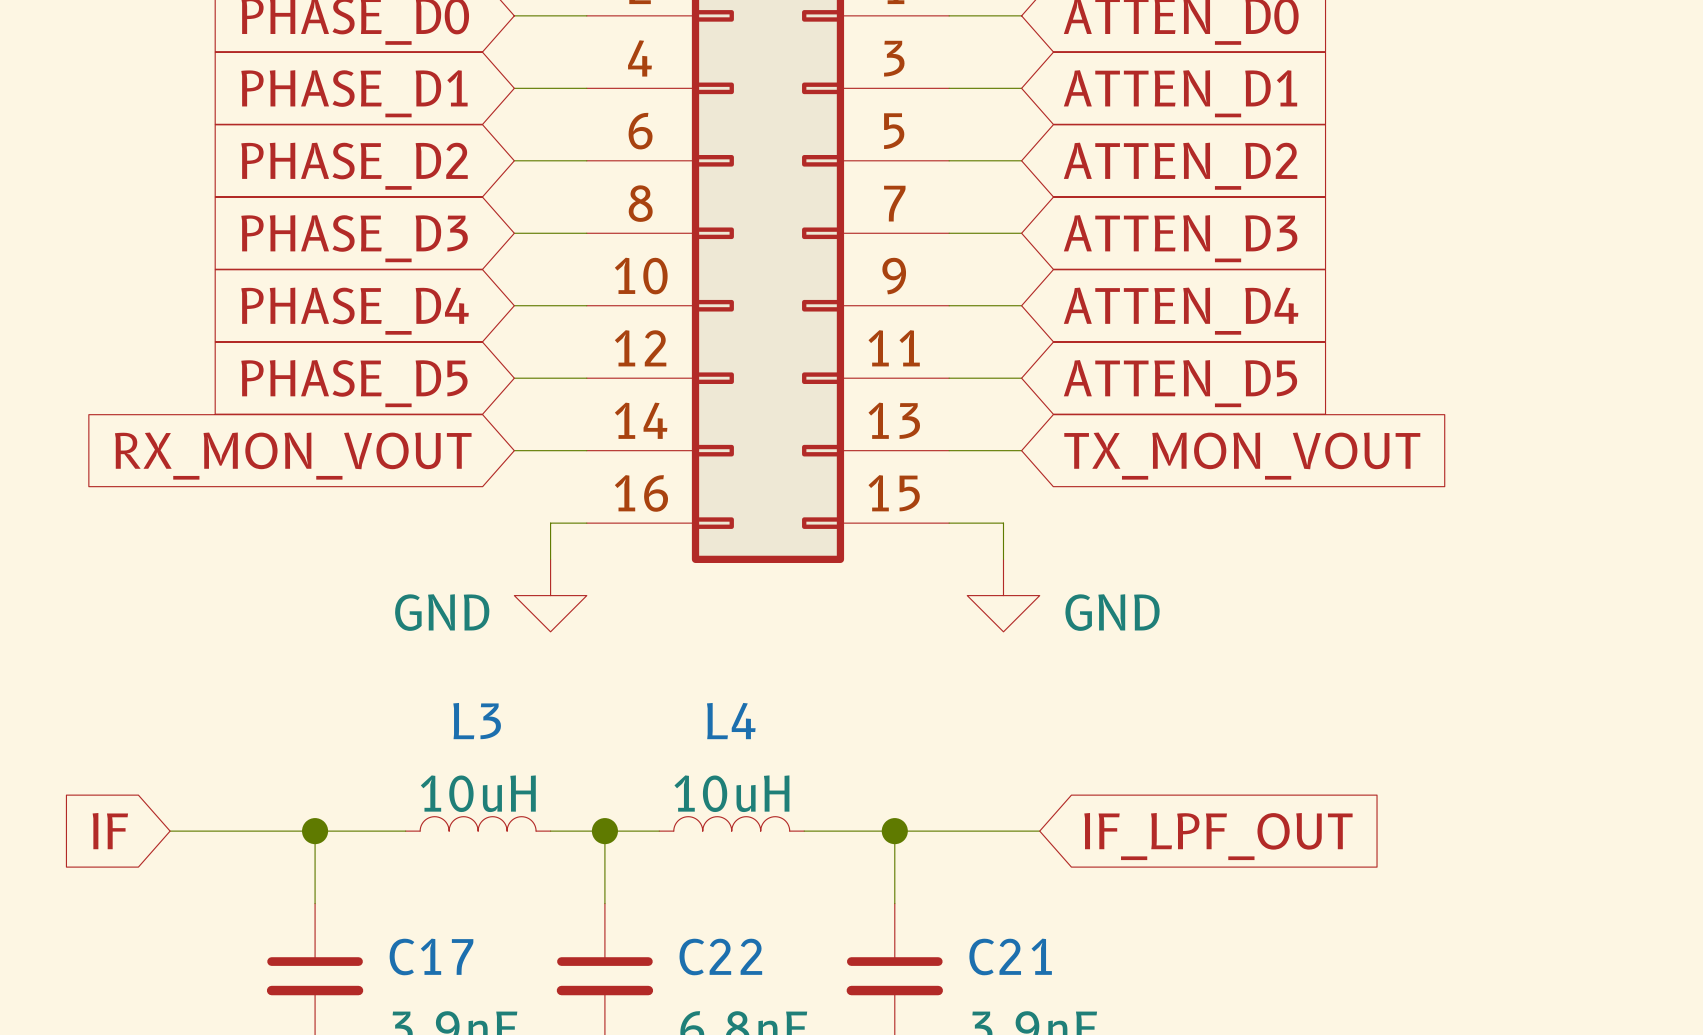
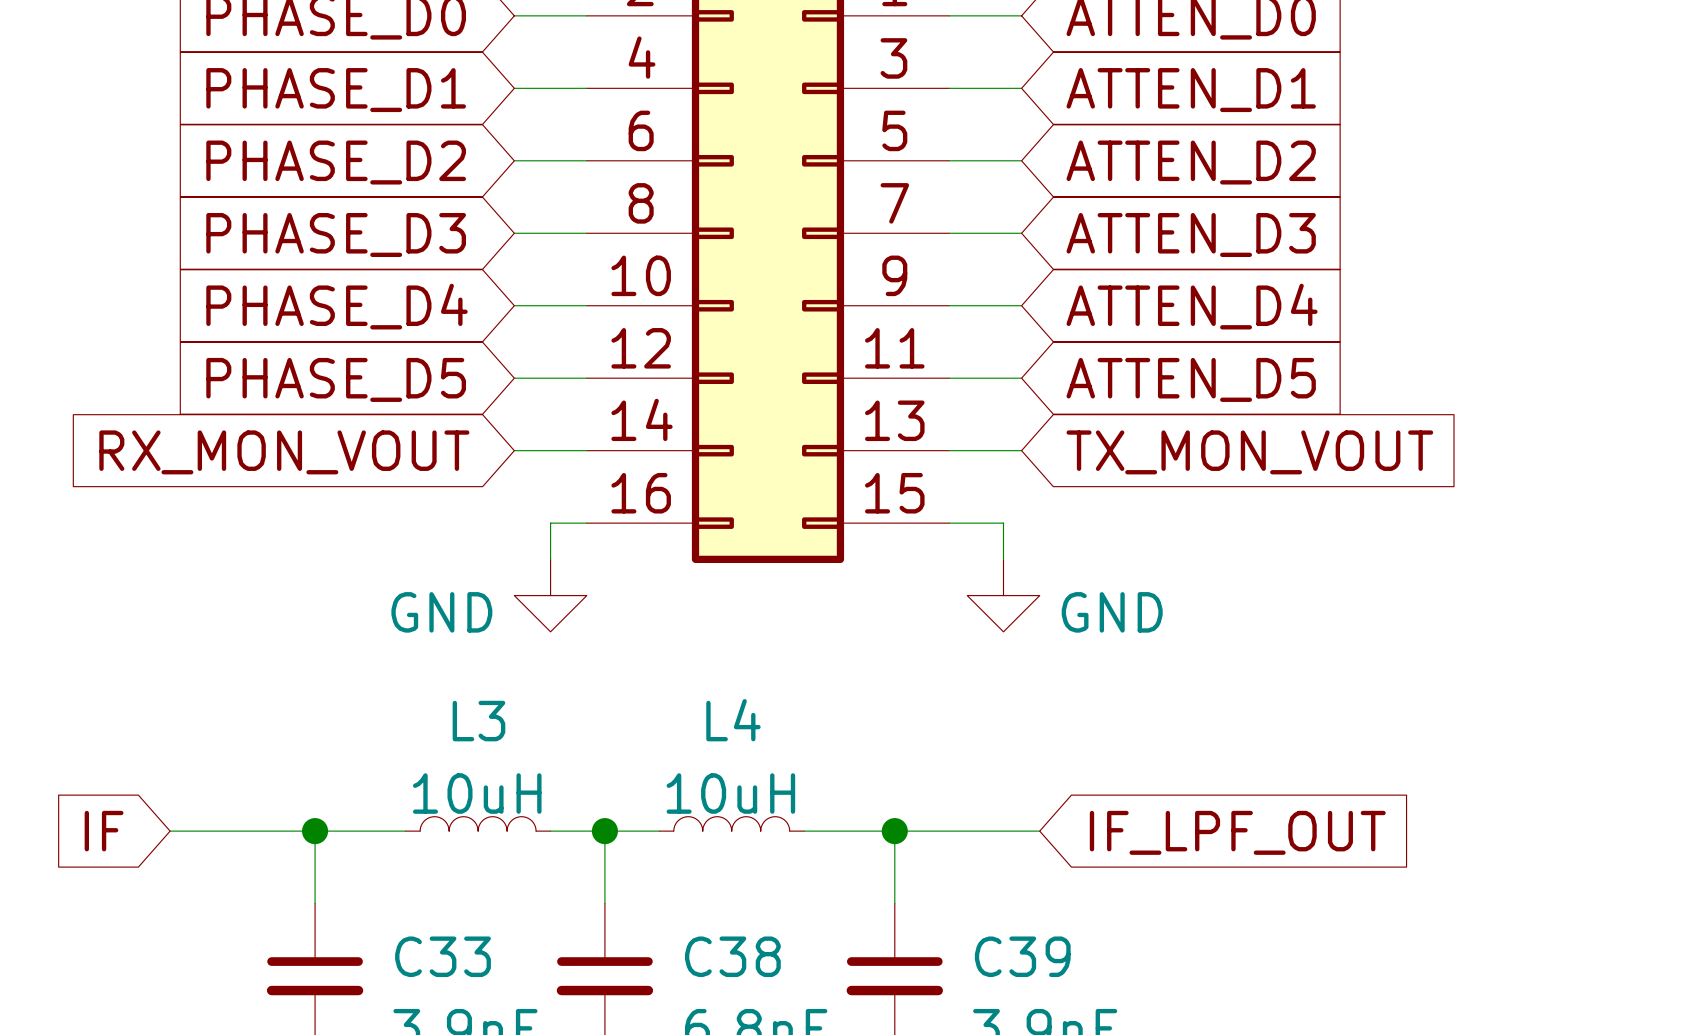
C17 name: C17 (431, 956) -> C33 (443, 956)
C22 name: C22 (720, 956) -> C38 (732, 956)
C21 name: C21 (1010, 956) -> C39 (1022, 956)

